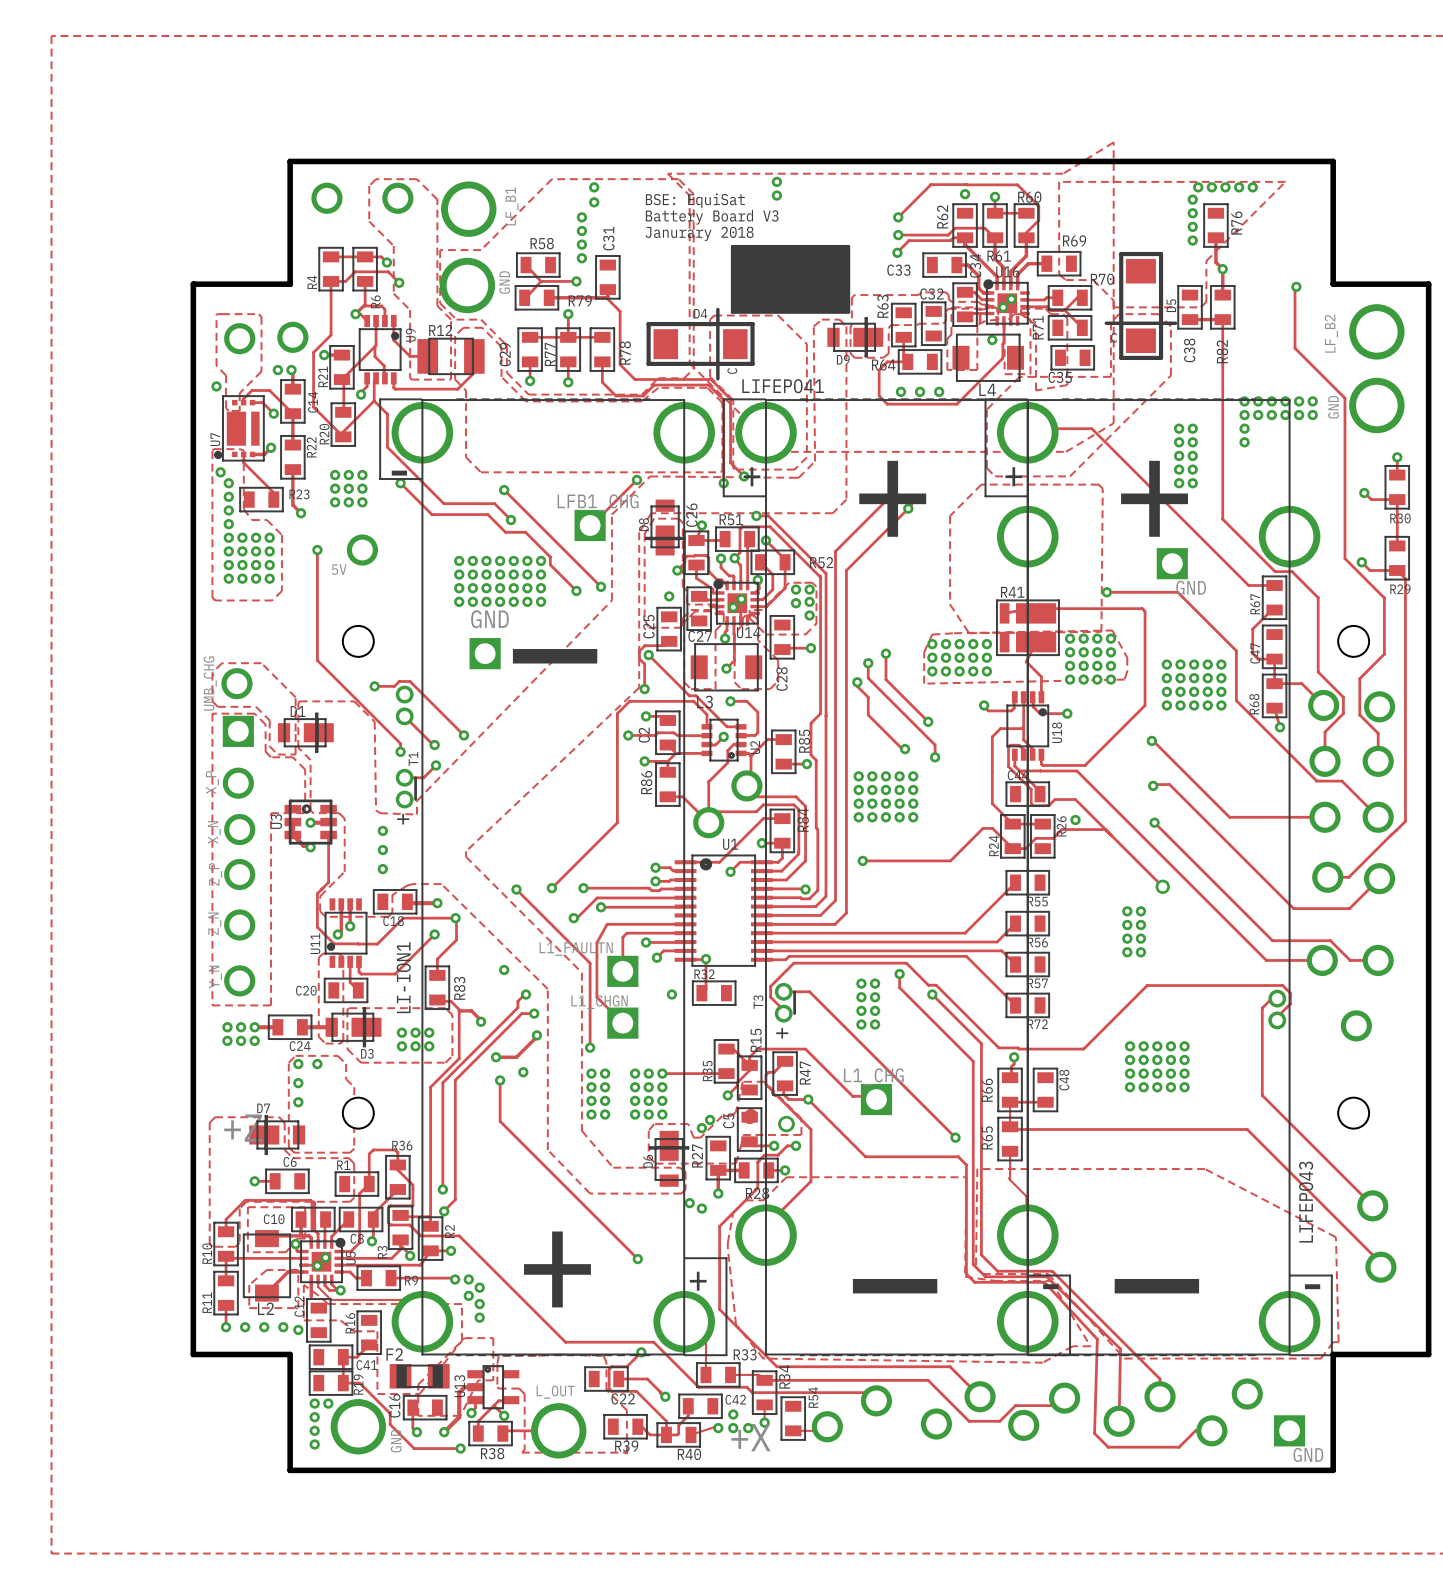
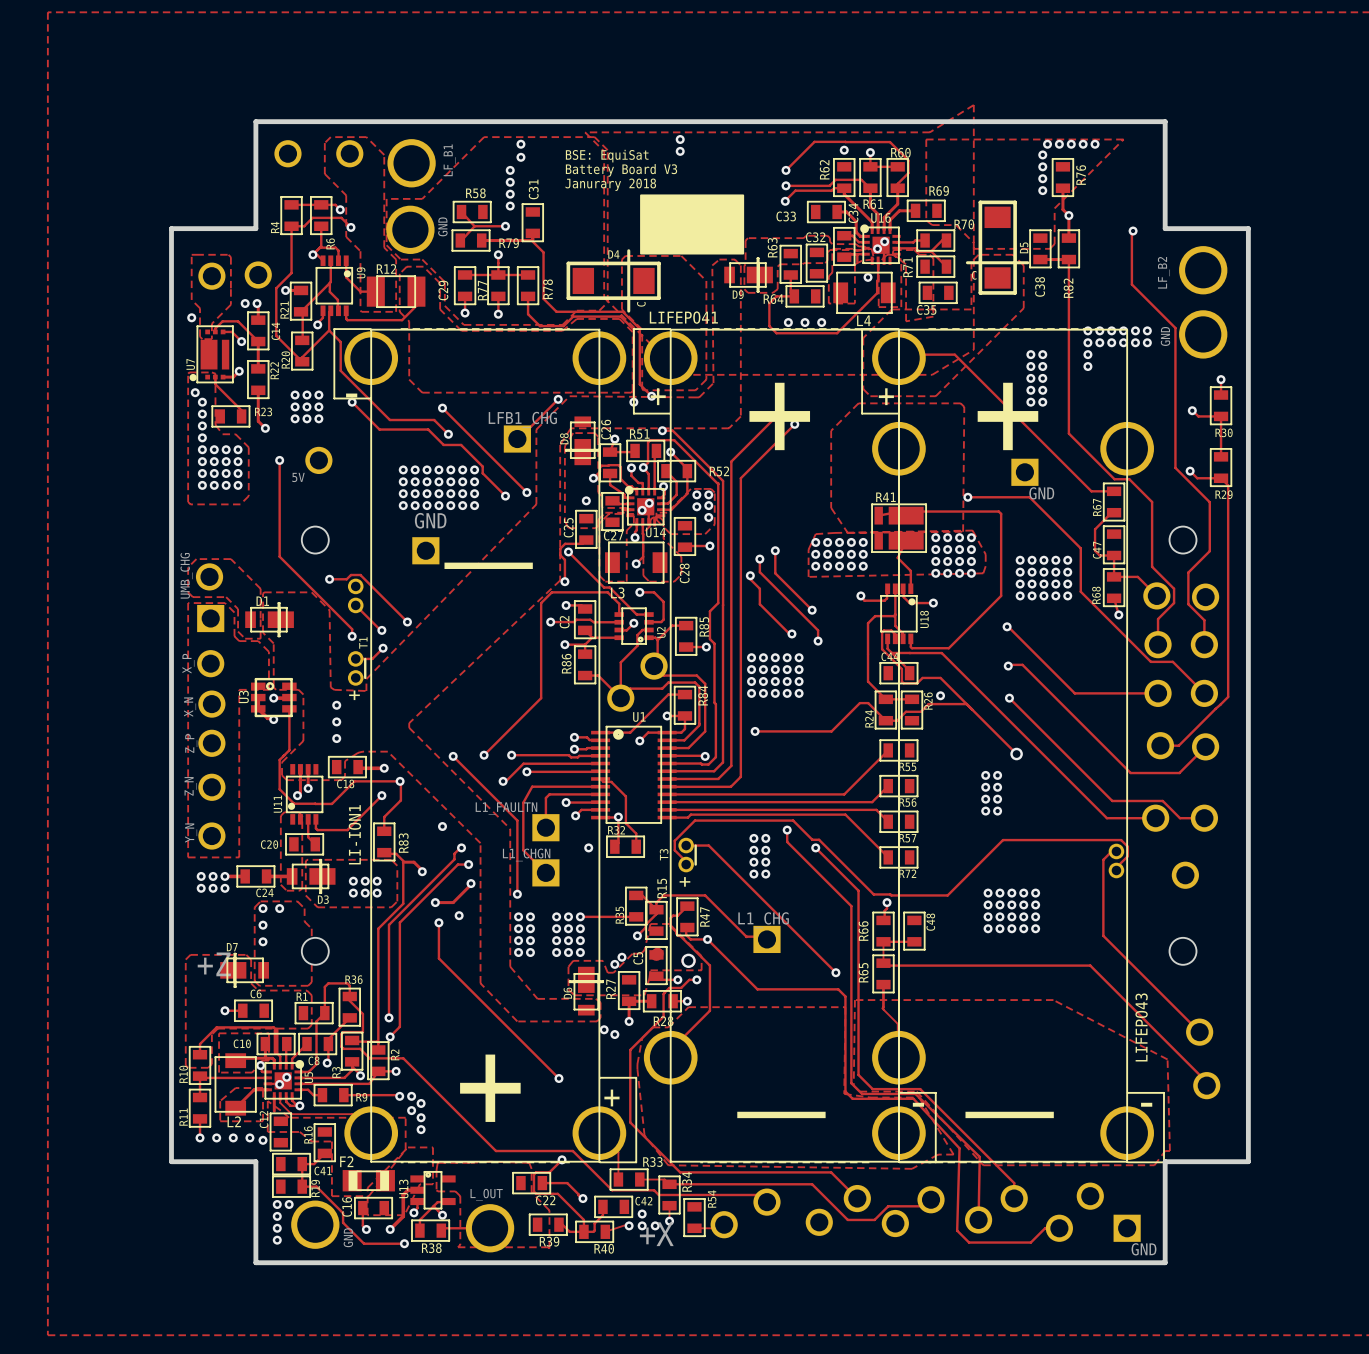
track: none -> (600, 778) (603, 781) (611, 781) (625, 796) (625, 823) (636, 833) (636, 846)

